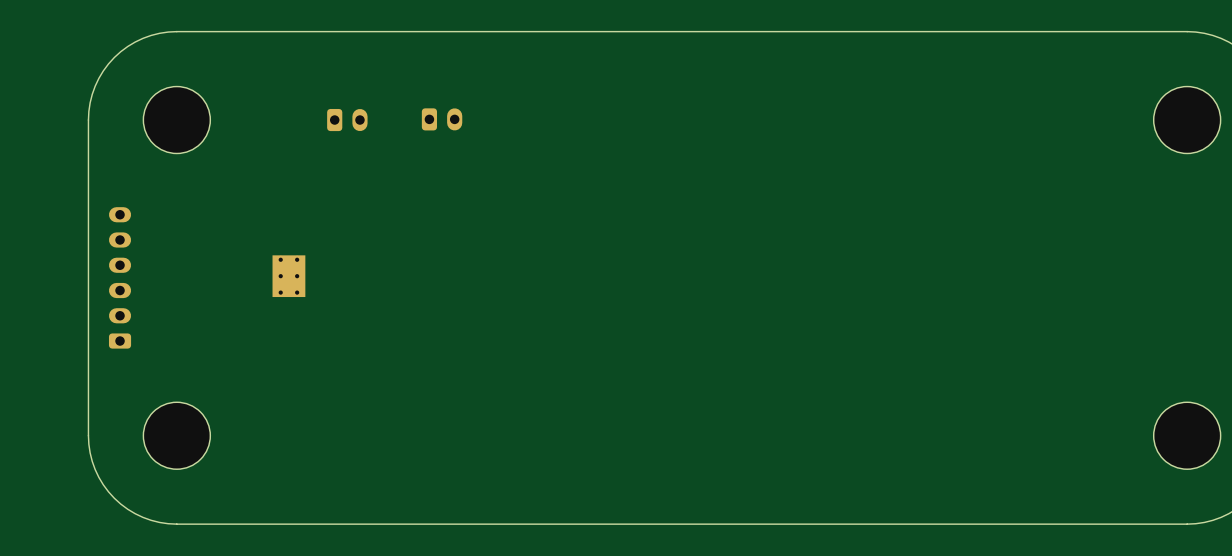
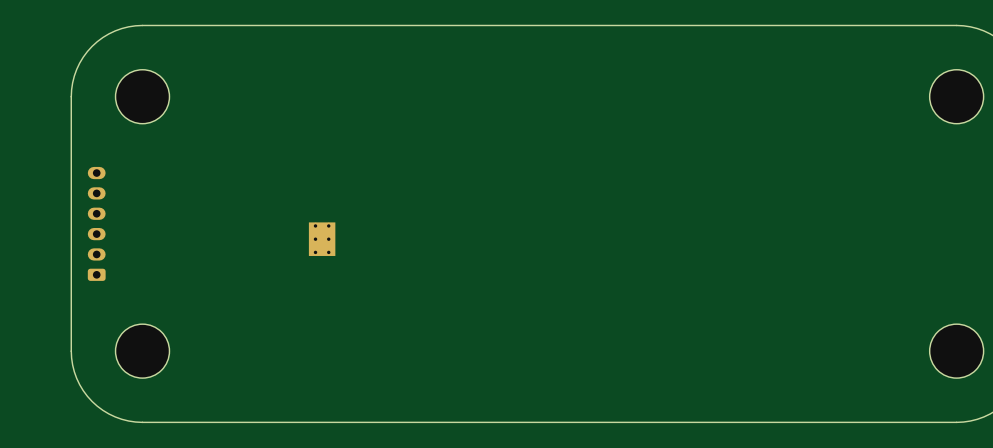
part: (442, 119) -> none
part: (347, 120) -> none
part position: (288, 276) -> (322, 239)

